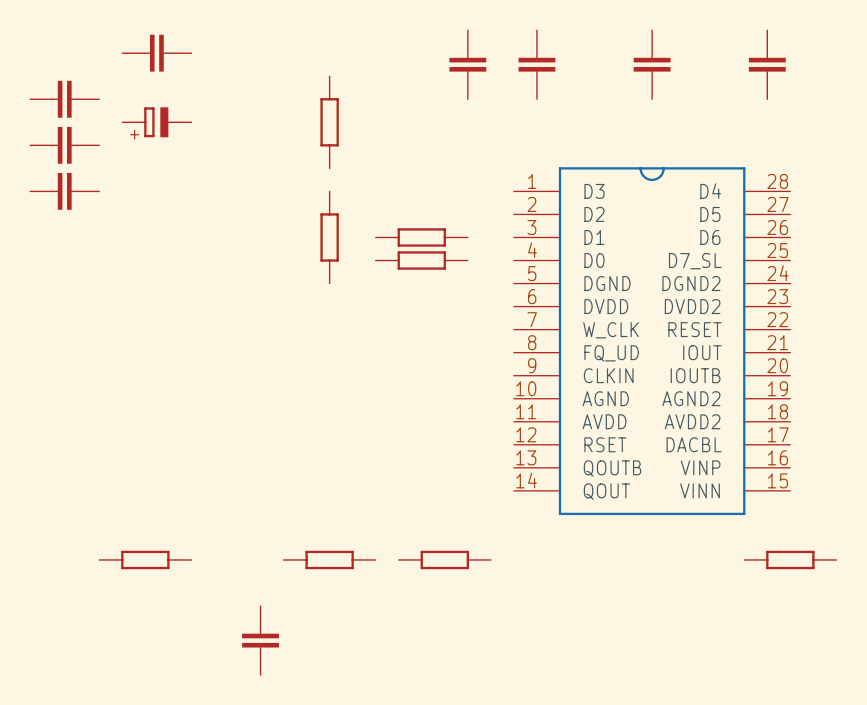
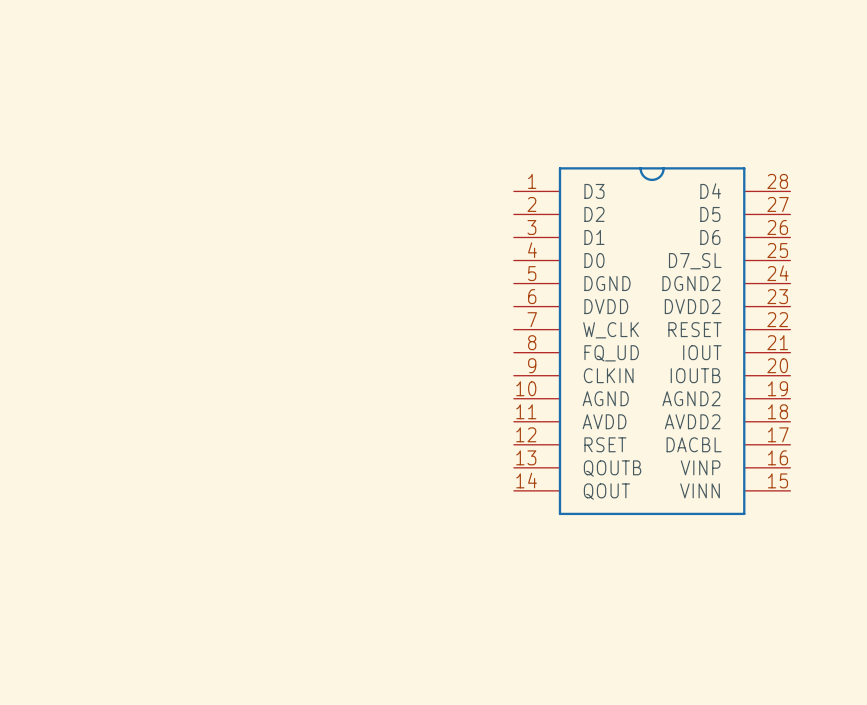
part: (156, 53) -> none
part: (467, 64) -> none
part: (536, 64) -> none
part: (652, 64) -> none
part: (767, 64) -> none
part: (64, 99) -> none
part: (156, 122) -> none
part: (329, 122) -> none
part: (64, 145) -> none
part: (64, 191) -> none
part: (329, 237) -> none
part: (421, 237) -> none
part: (421, 260) -> none
part: (145, 559) -> none
part: (329, 559) -> none
part: (444, 559) -> none
part: (790, 559) -> none
part: (260, 640) -> none

